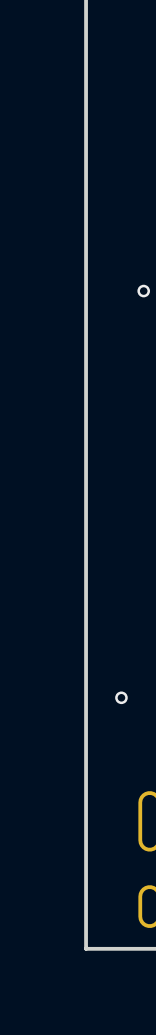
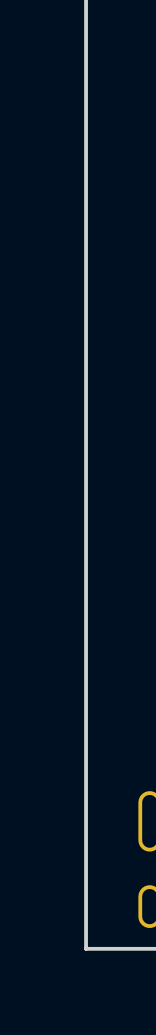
via: (143, 291) -> none
via: (121, 697) -> none

